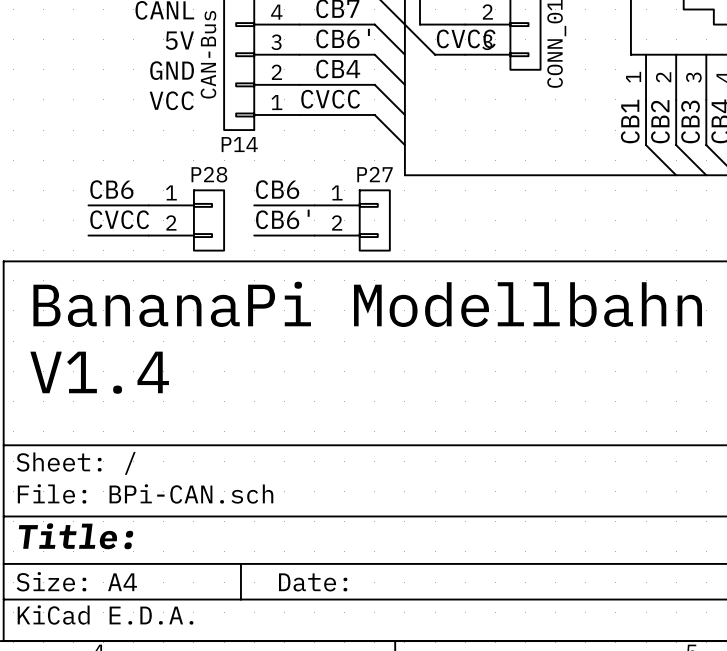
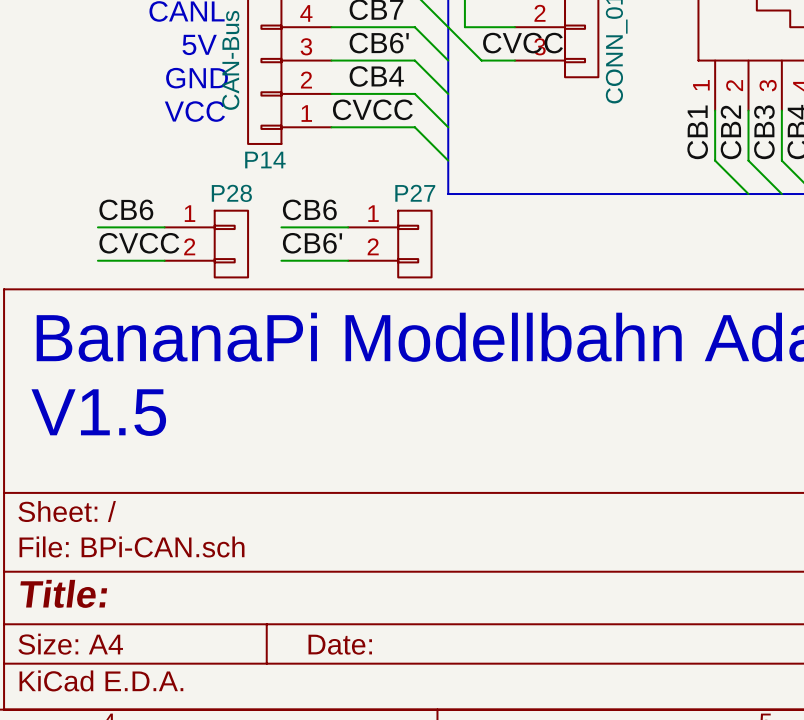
text: V1.4 (99, 372) -> V1.5 (98, 412)

